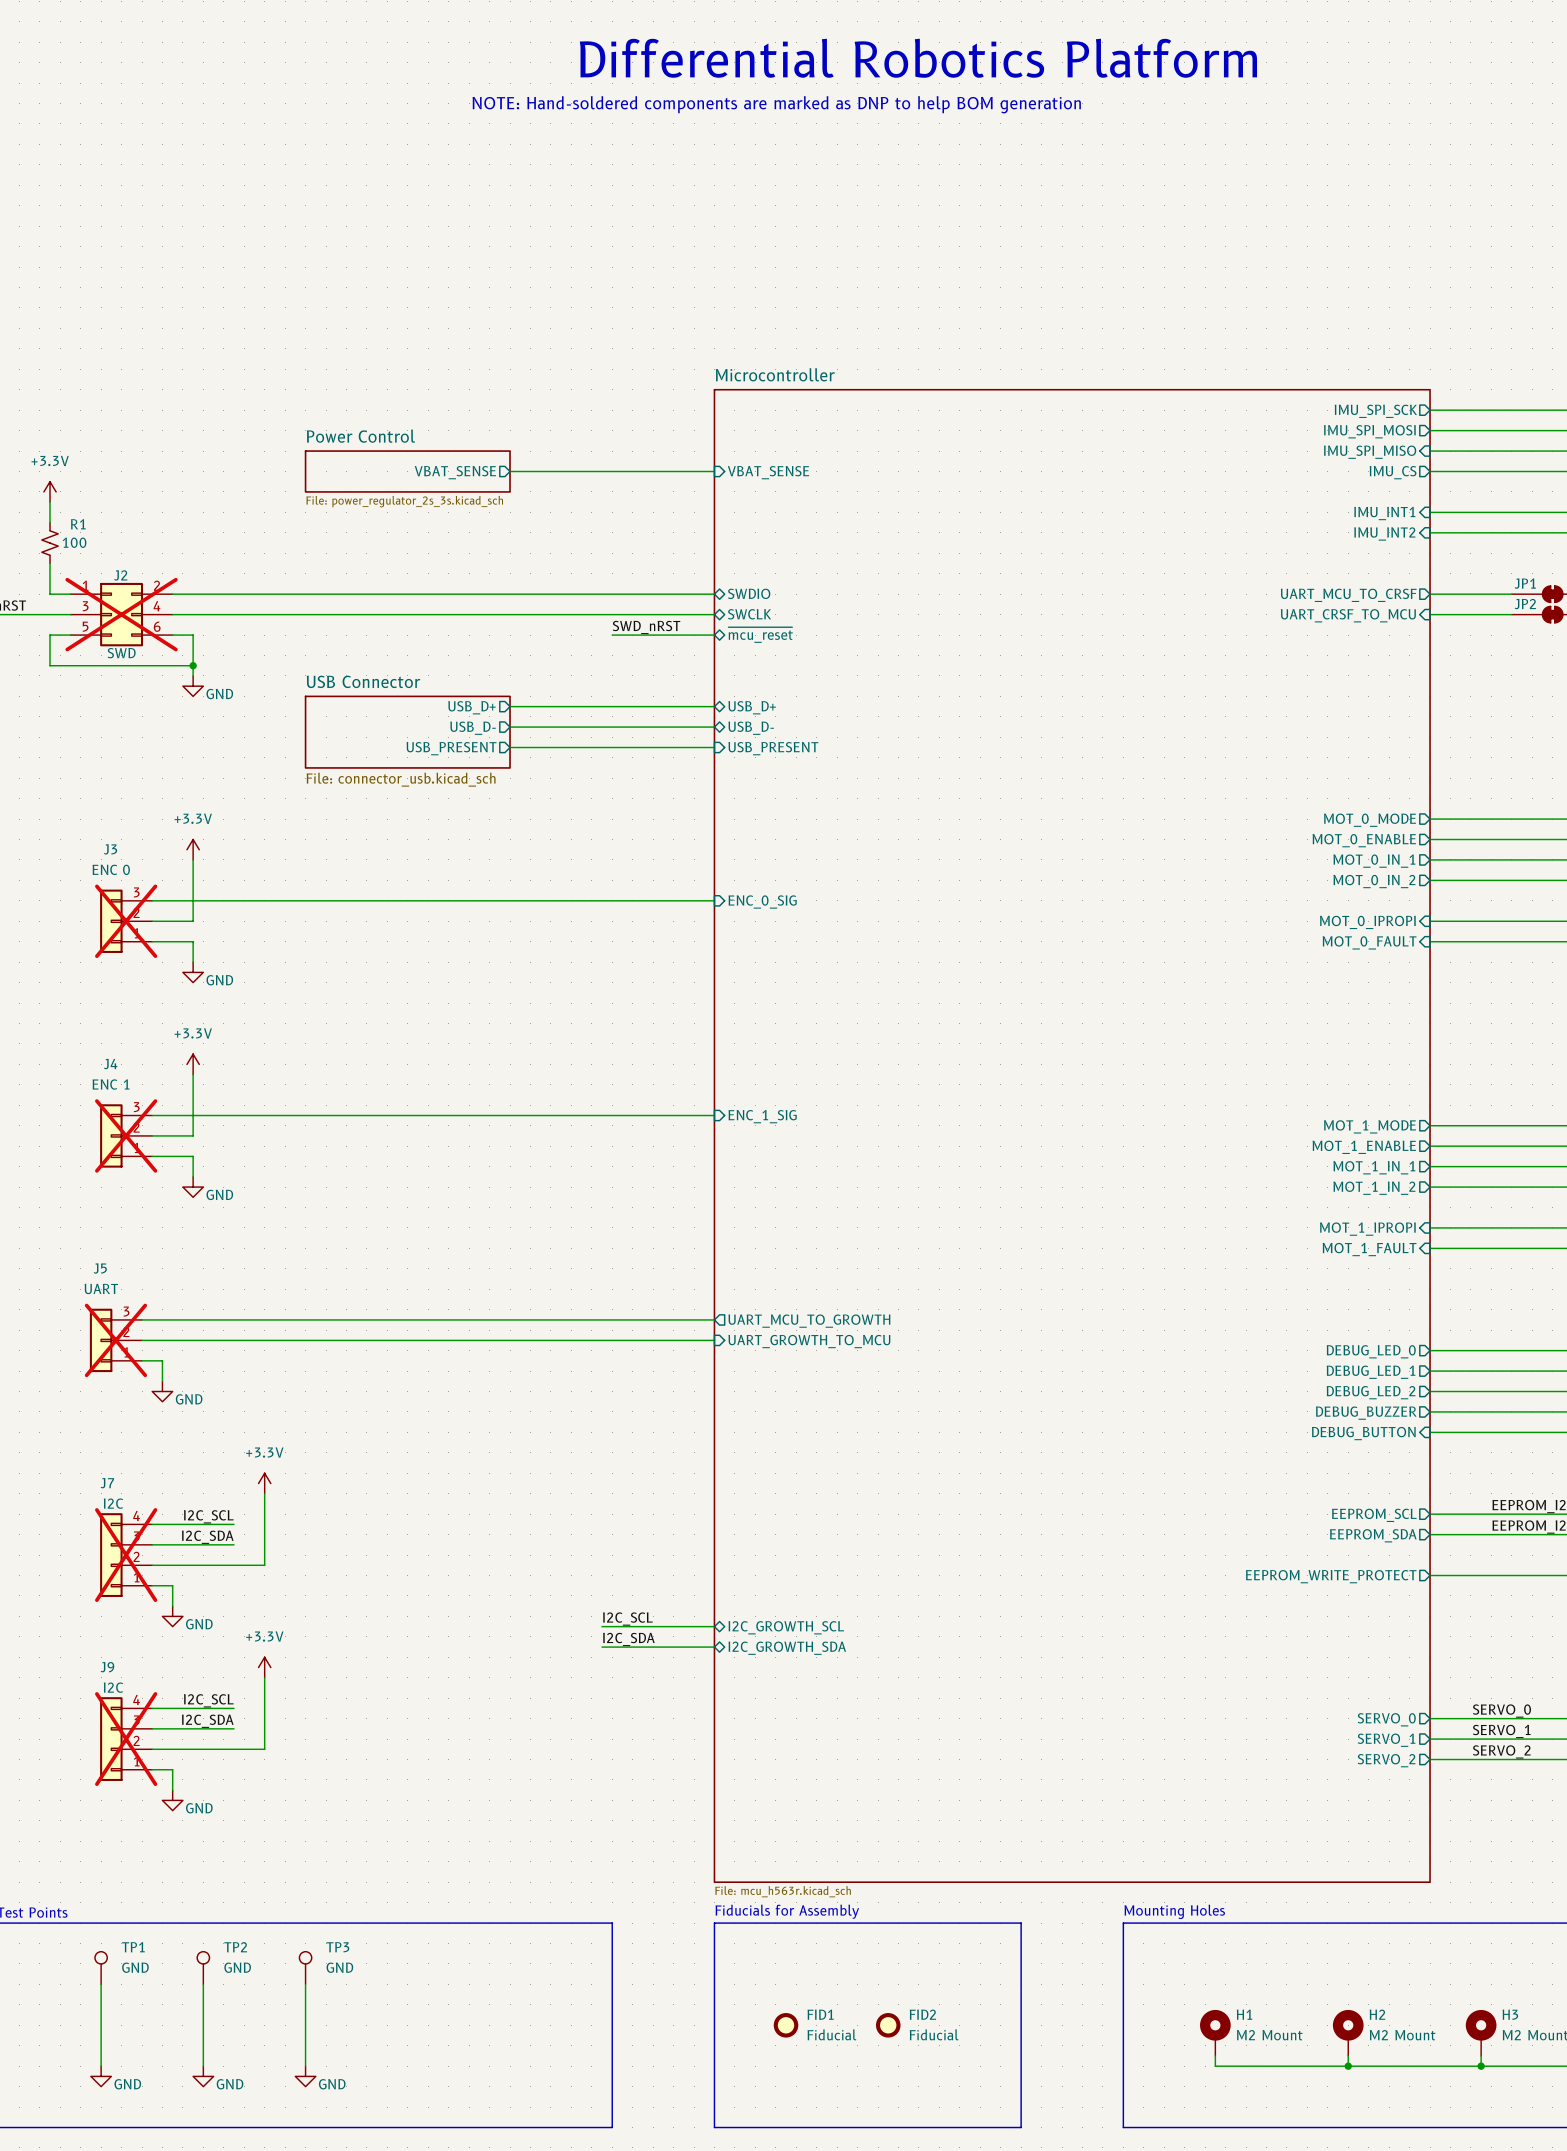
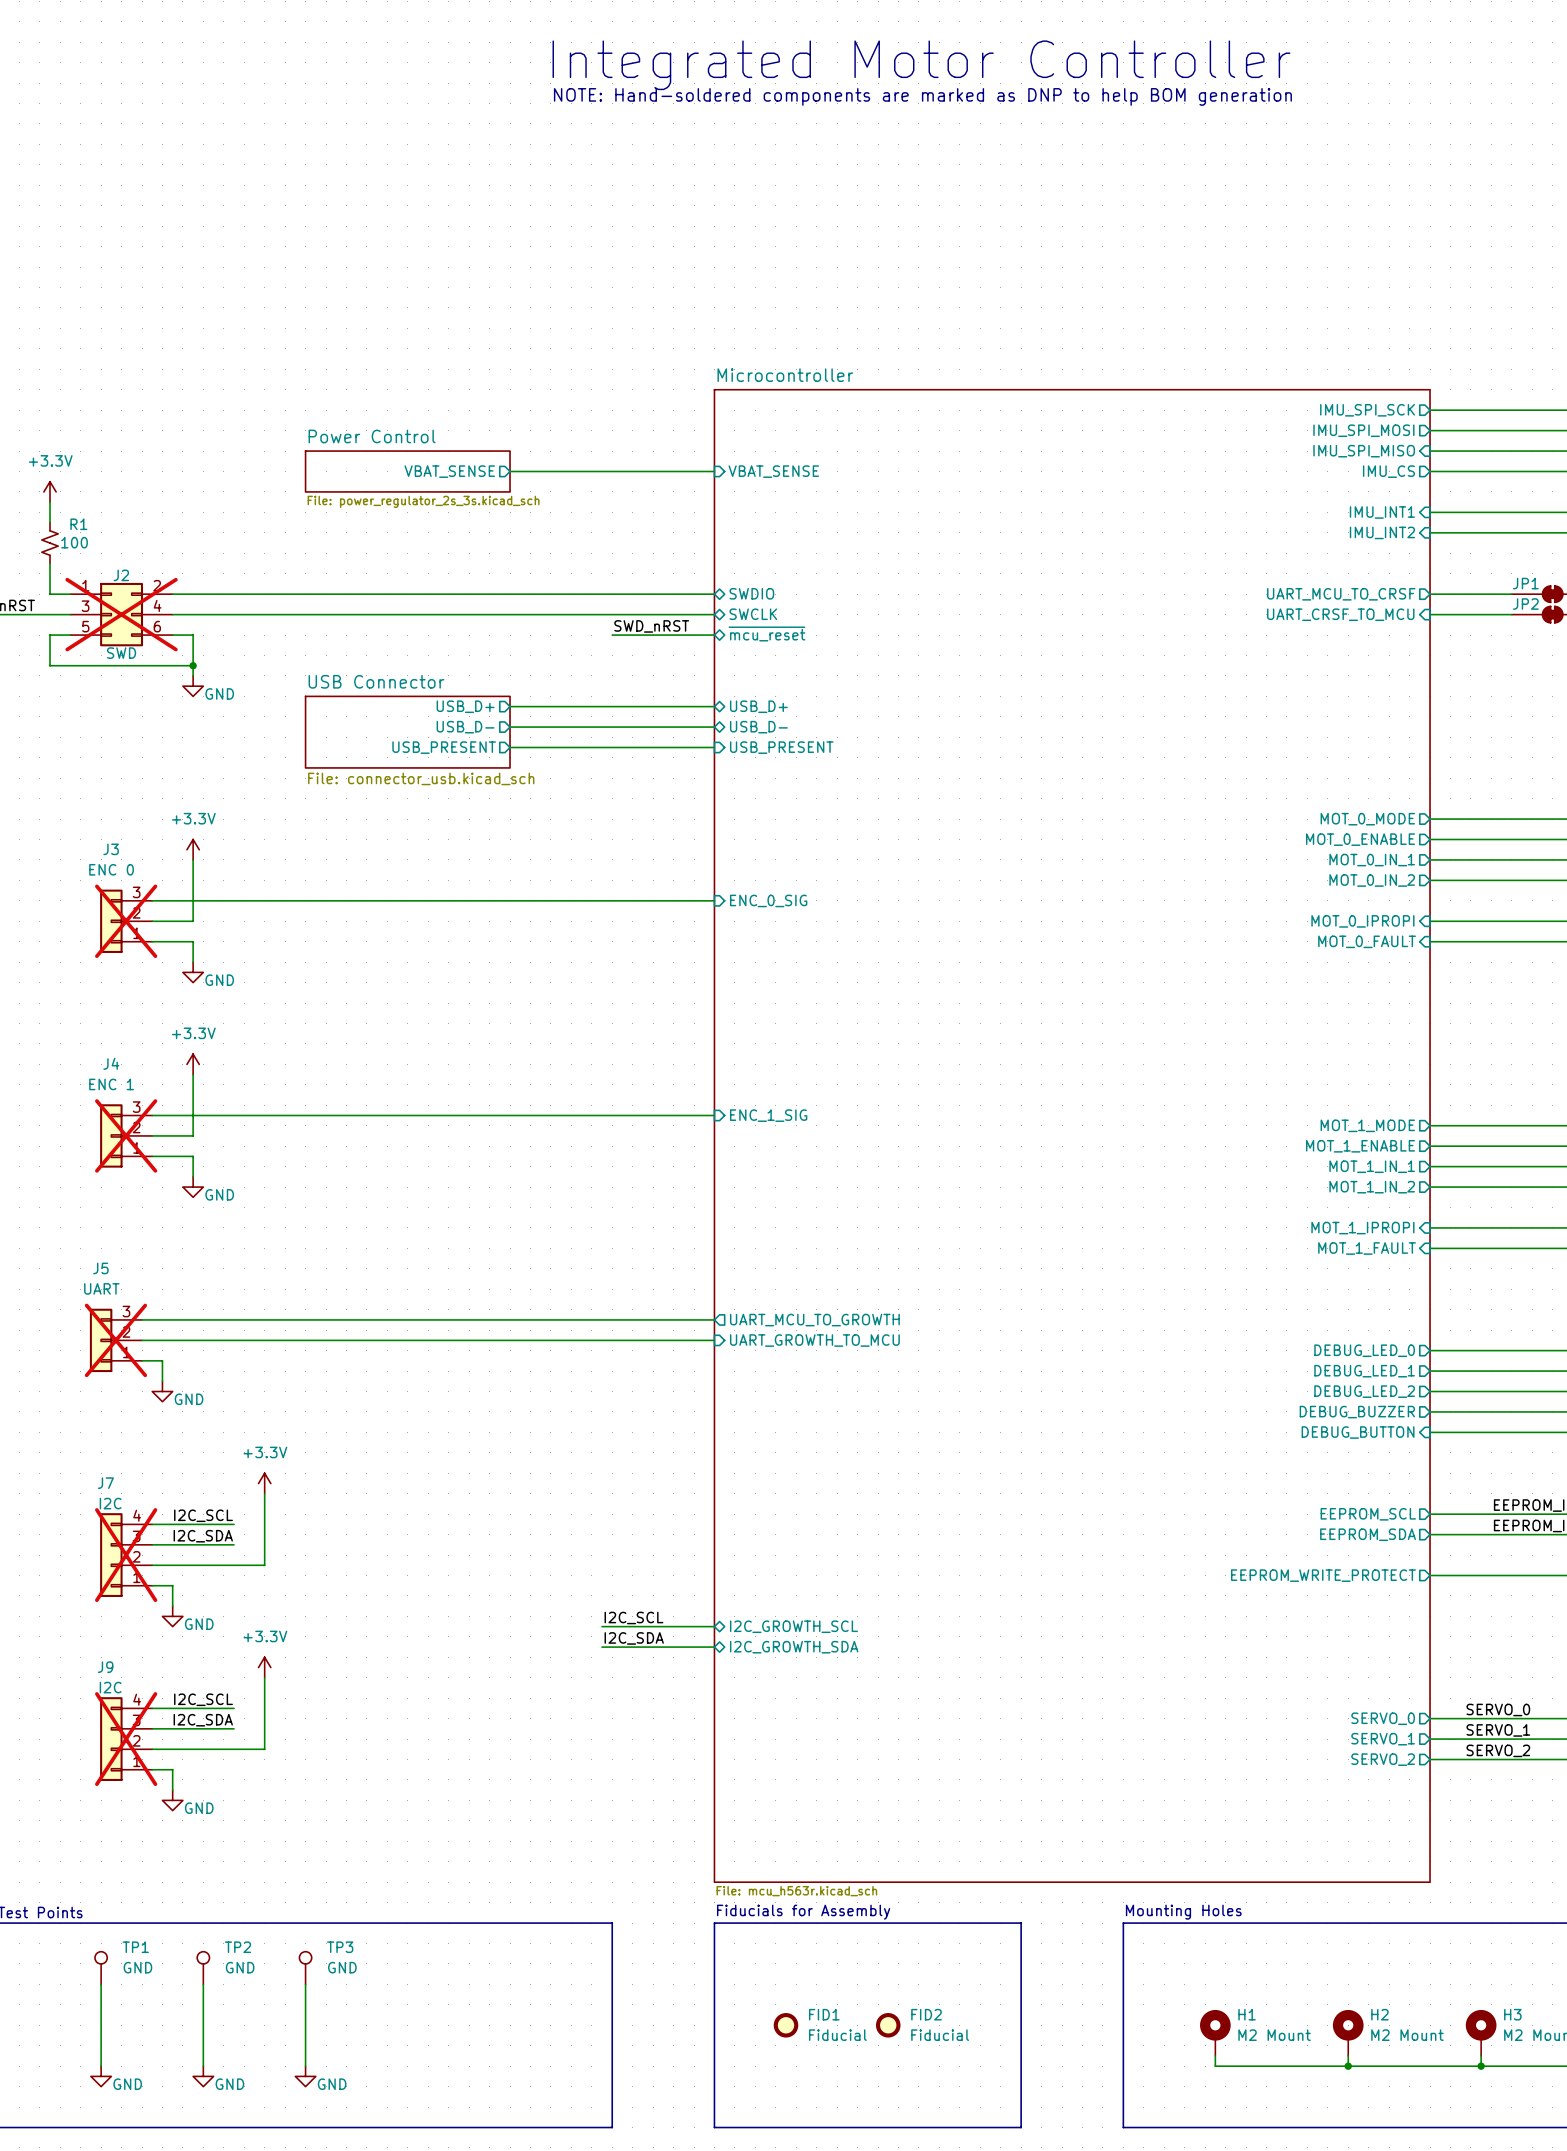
text: Differential Robotics Platform (918, 58) -> Integrated Motor Controller (921, 65)
text position: NOTE: Hand-soldered components are marked as DNP to help BOM generation (776, 104) -> NOTE: Hand-soldered components are marked as DNP to help BOM generation (922, 96)

